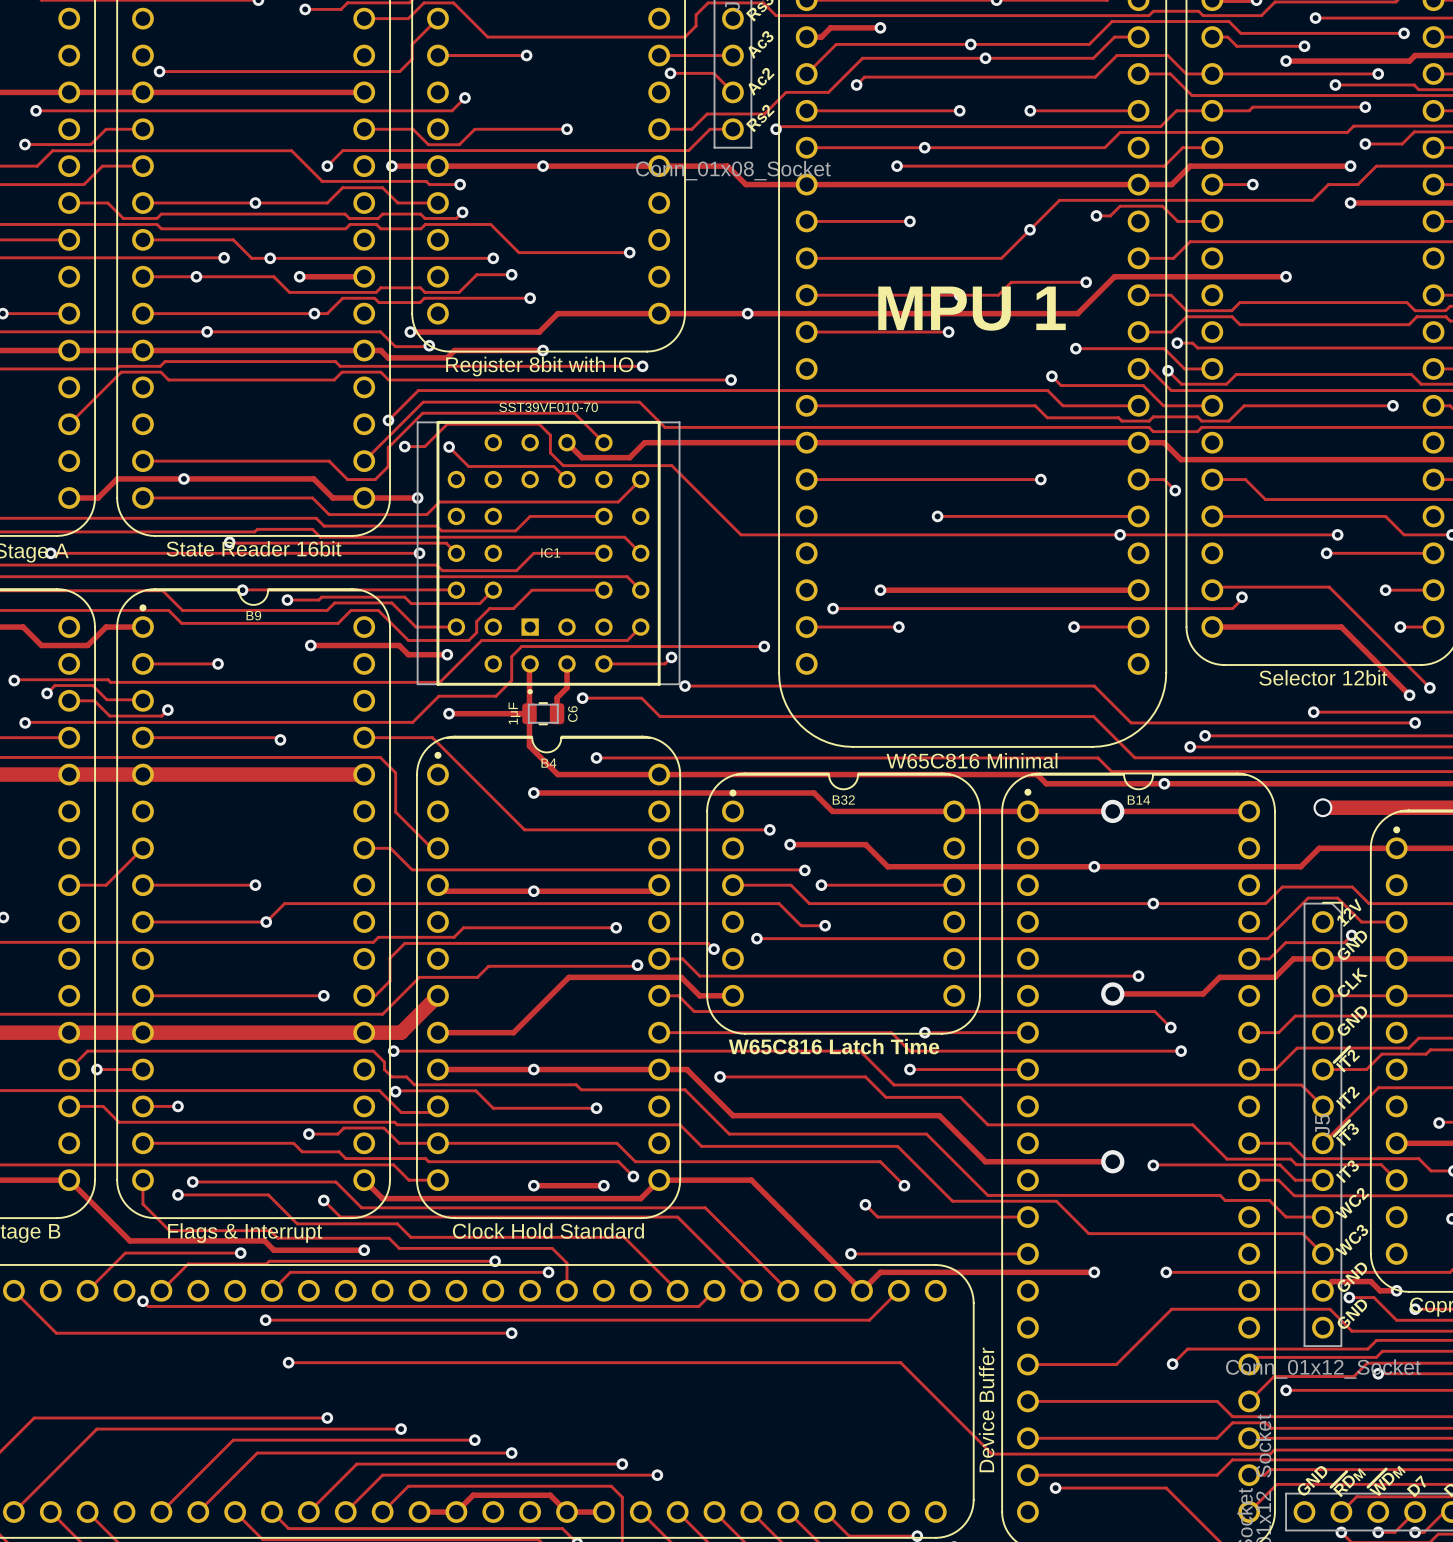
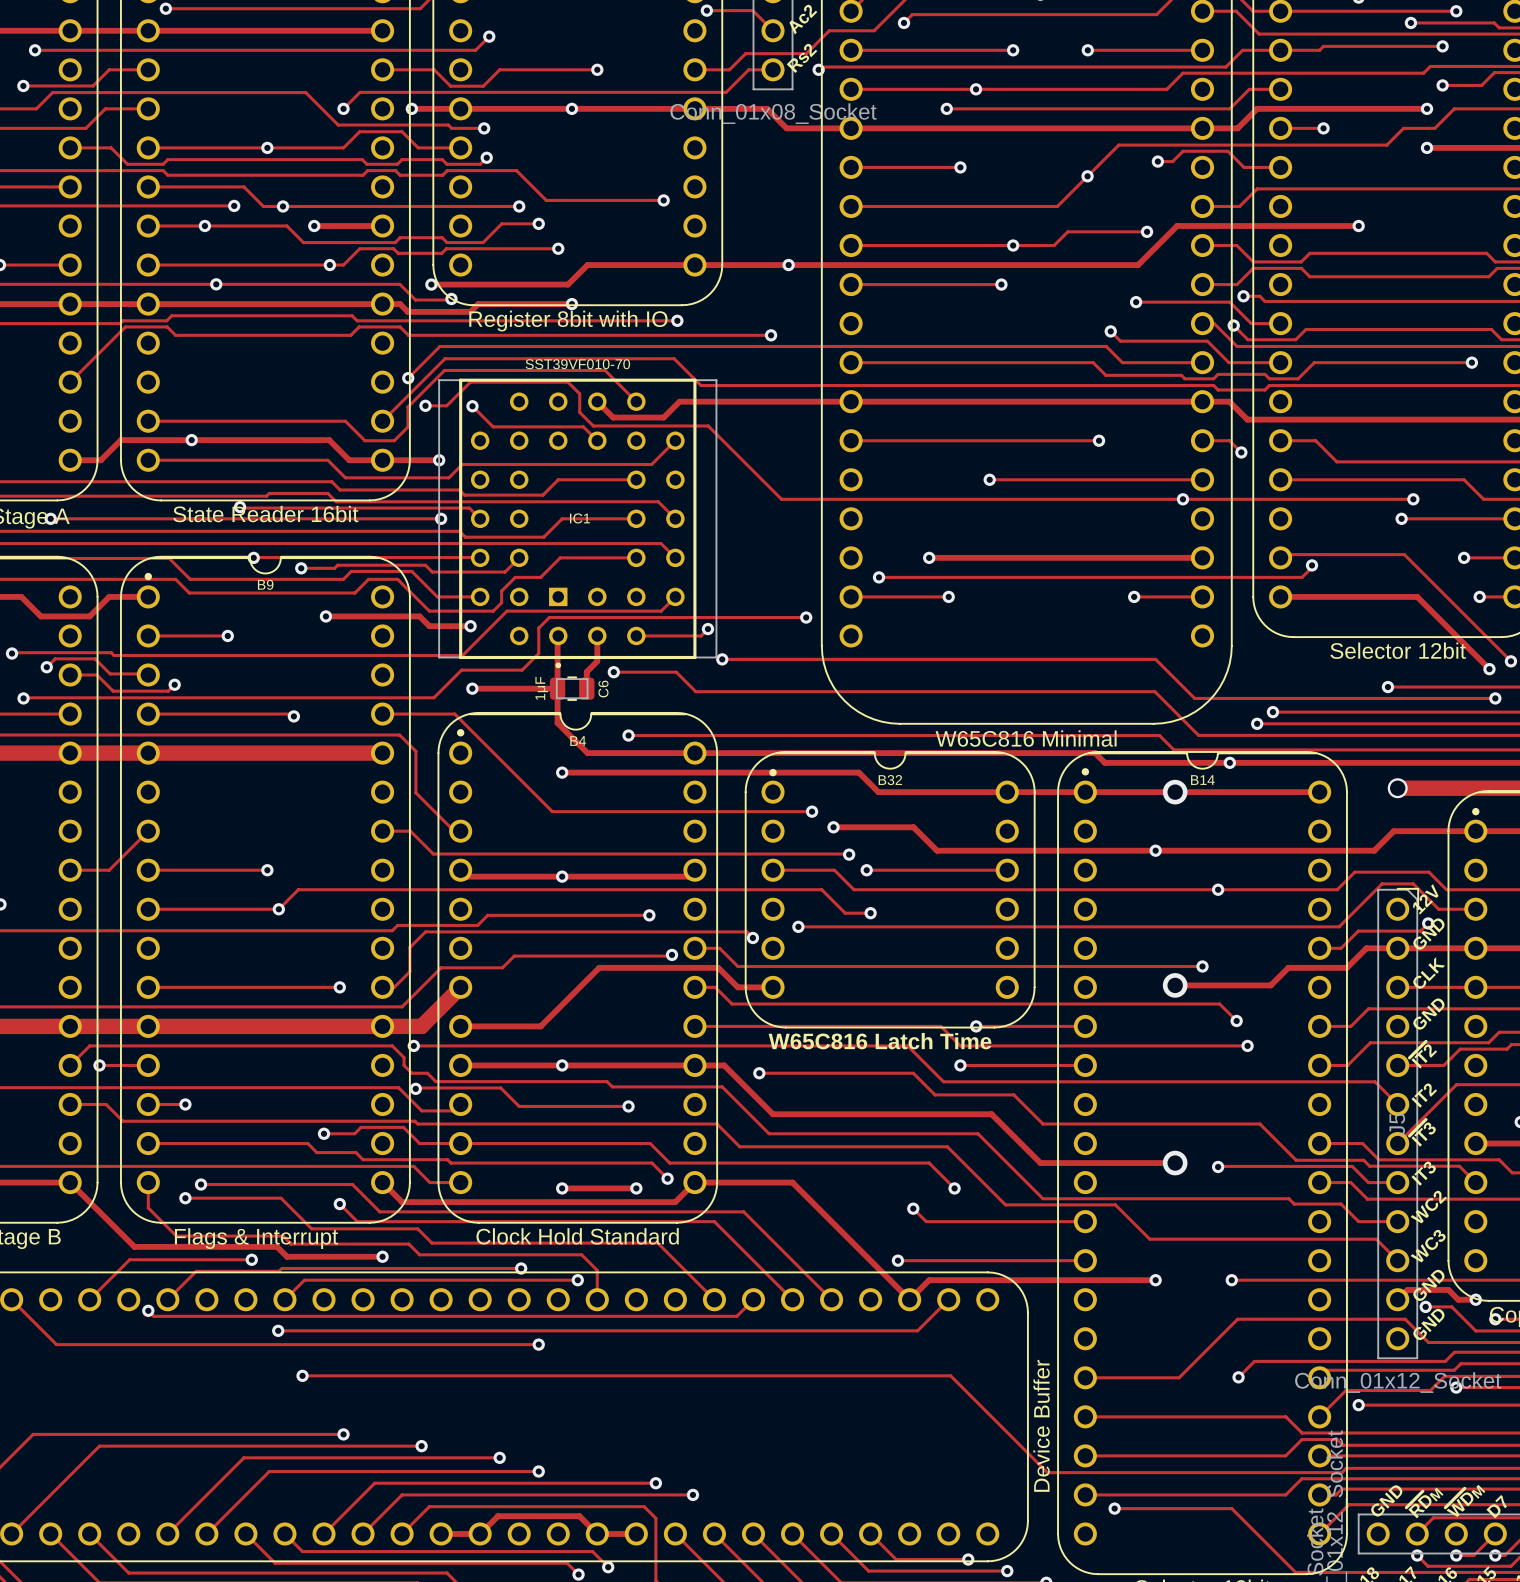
text: MPU 1 (972, 308) -> none

